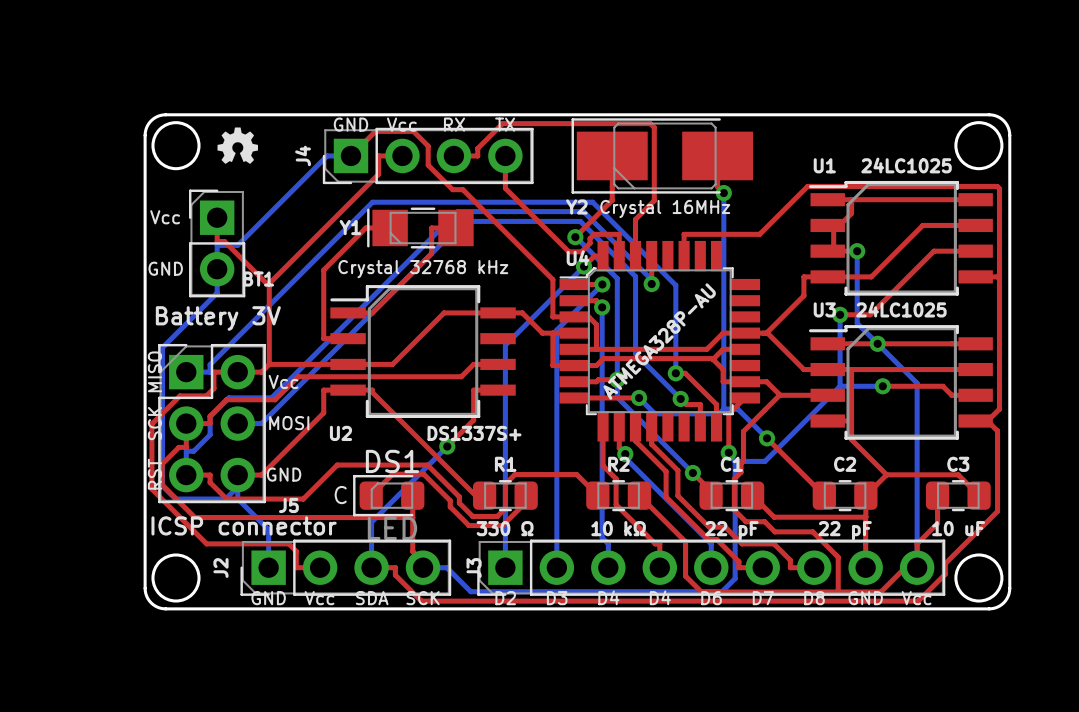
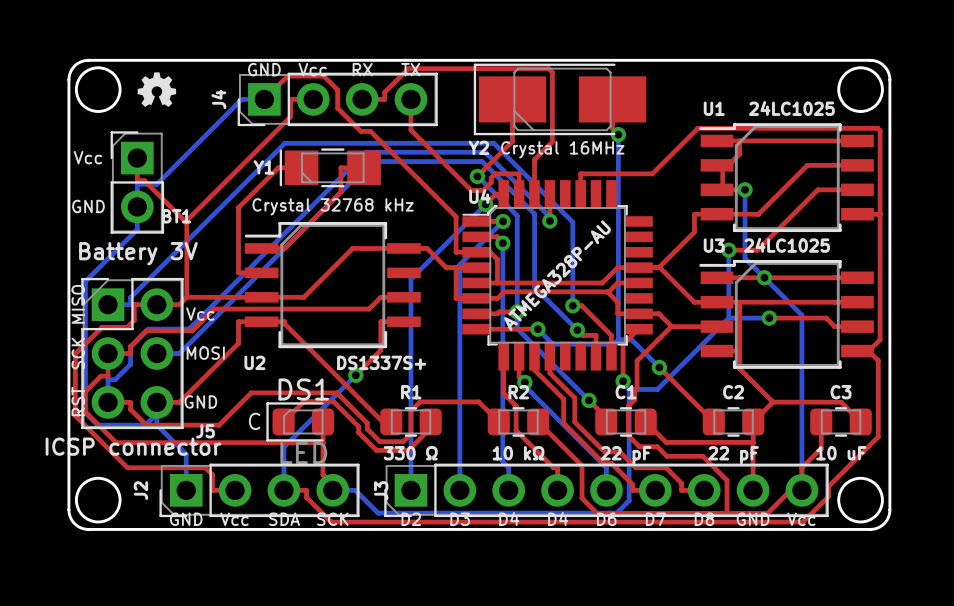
J5 value position: ICSP connector (244, 525) -> ICSP connector (133, 446)

